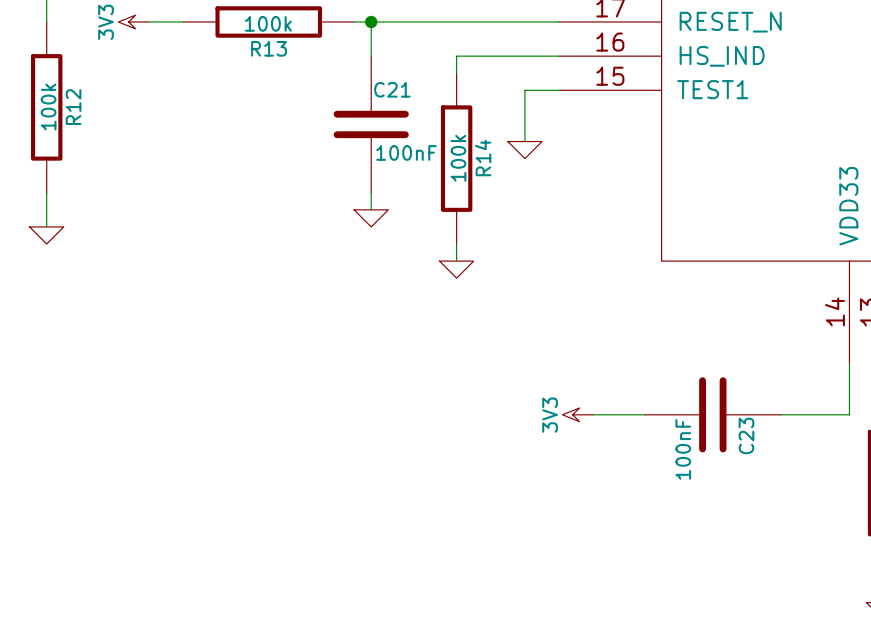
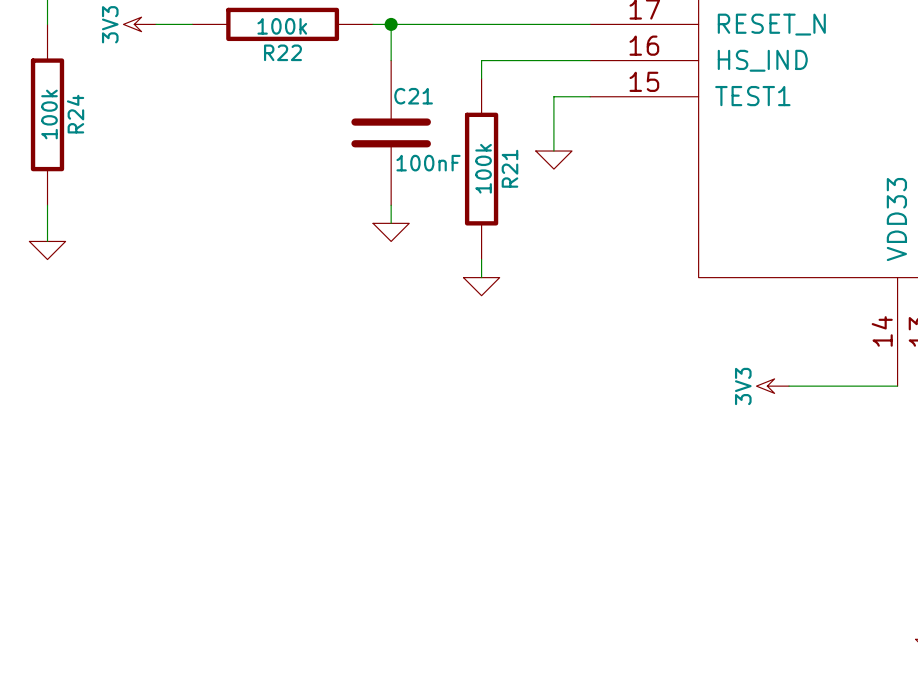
R13 name: R13 (269, 48) -> R22 (282, 52)
R12 name: R12 (73, 107) -> R24 (75, 114)
R14 name: R14 (483, 157) -> R21 (509, 168)
wire: (849, 363) (849, 414) (781, 414) -> (897, 386) (789, 386)
power symbol position: 3V3 (577, 414) -> 3V3 (772, 386)
wire: (593, 414) (644, 414) -> none
C23: 100nF (712, 414) -> none

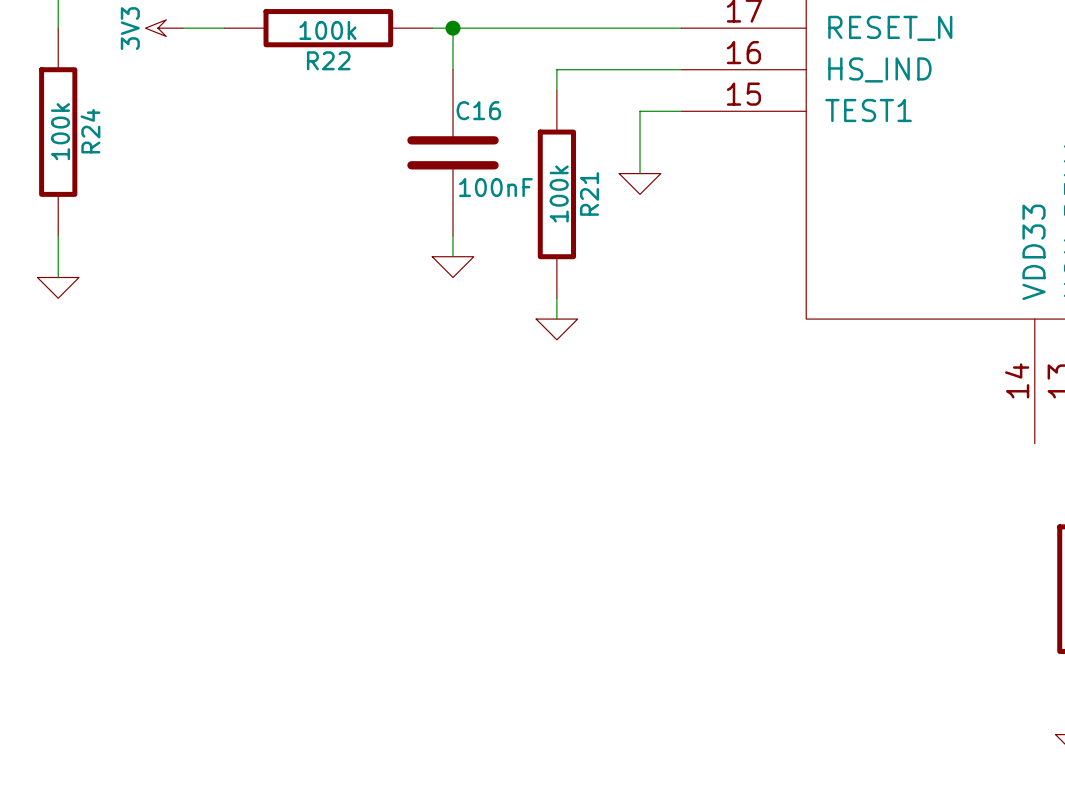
C21 name: C21 (413, 96) -> C16 (478, 110)
power symbol: 3V3 (772, 386) -> none
wire: (789, 386) (897, 386) -> none

